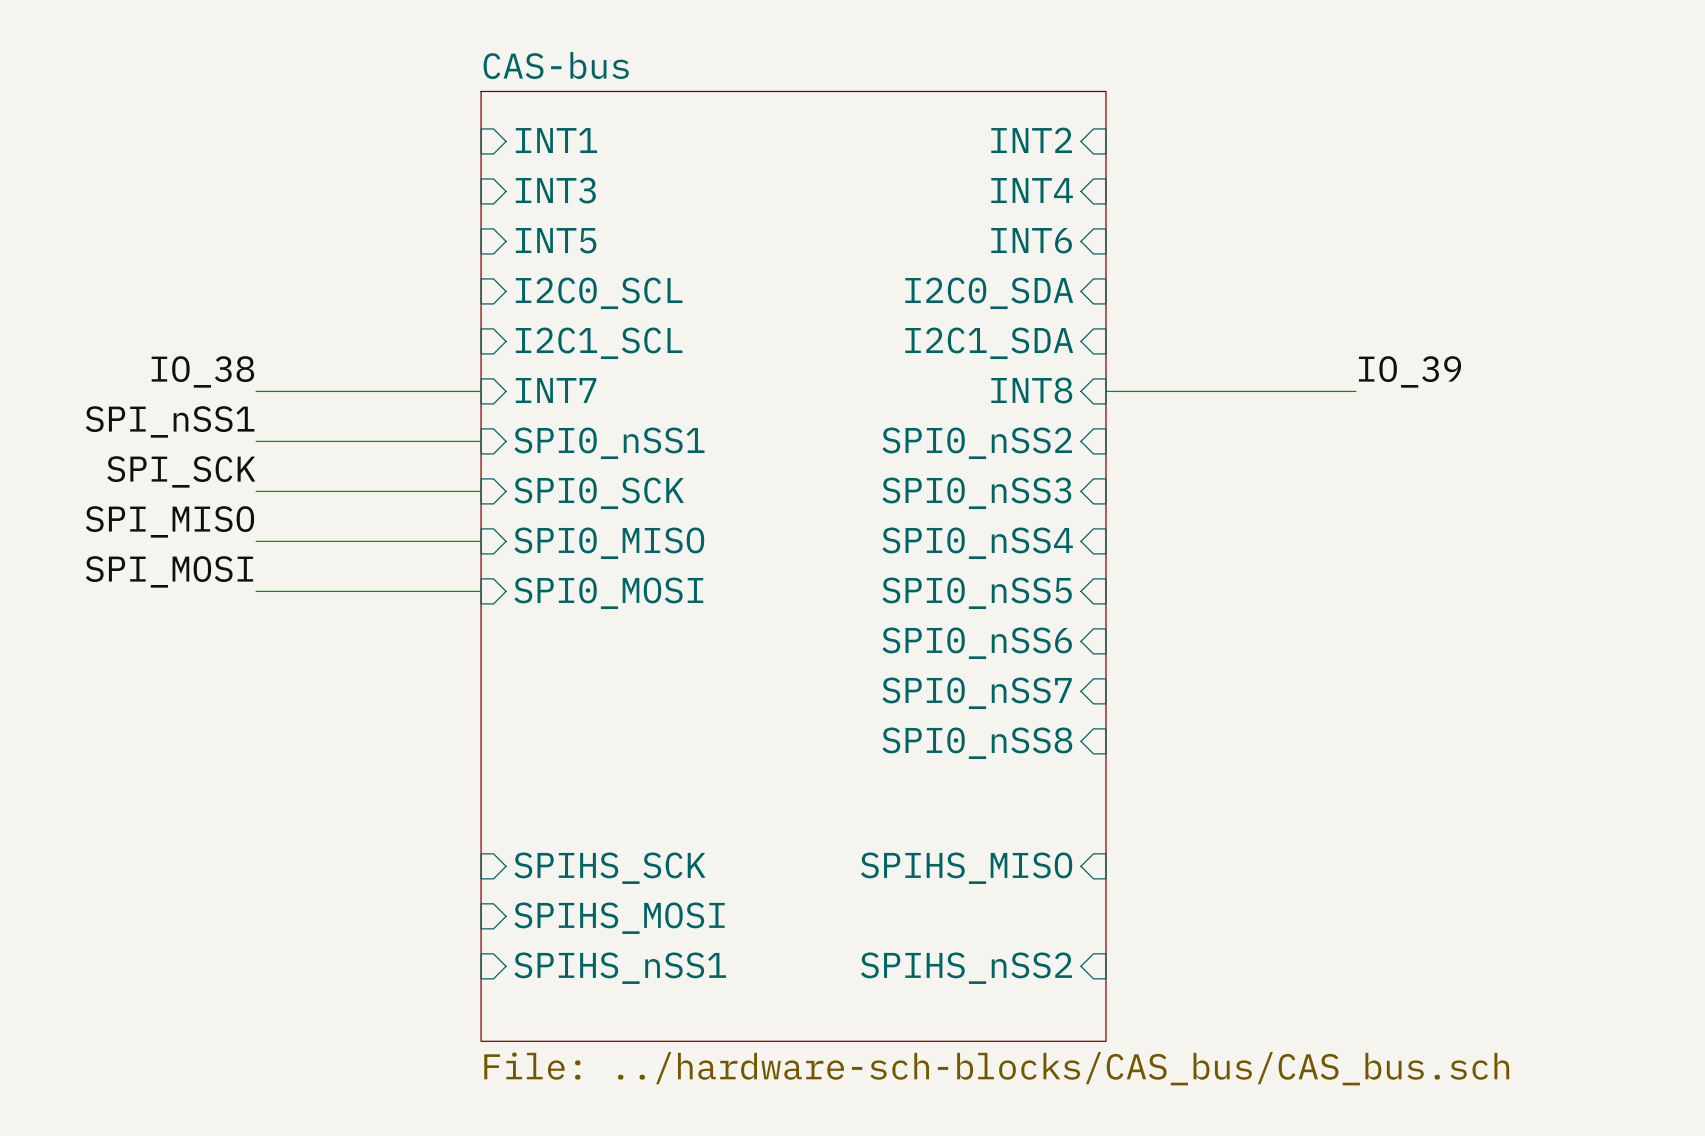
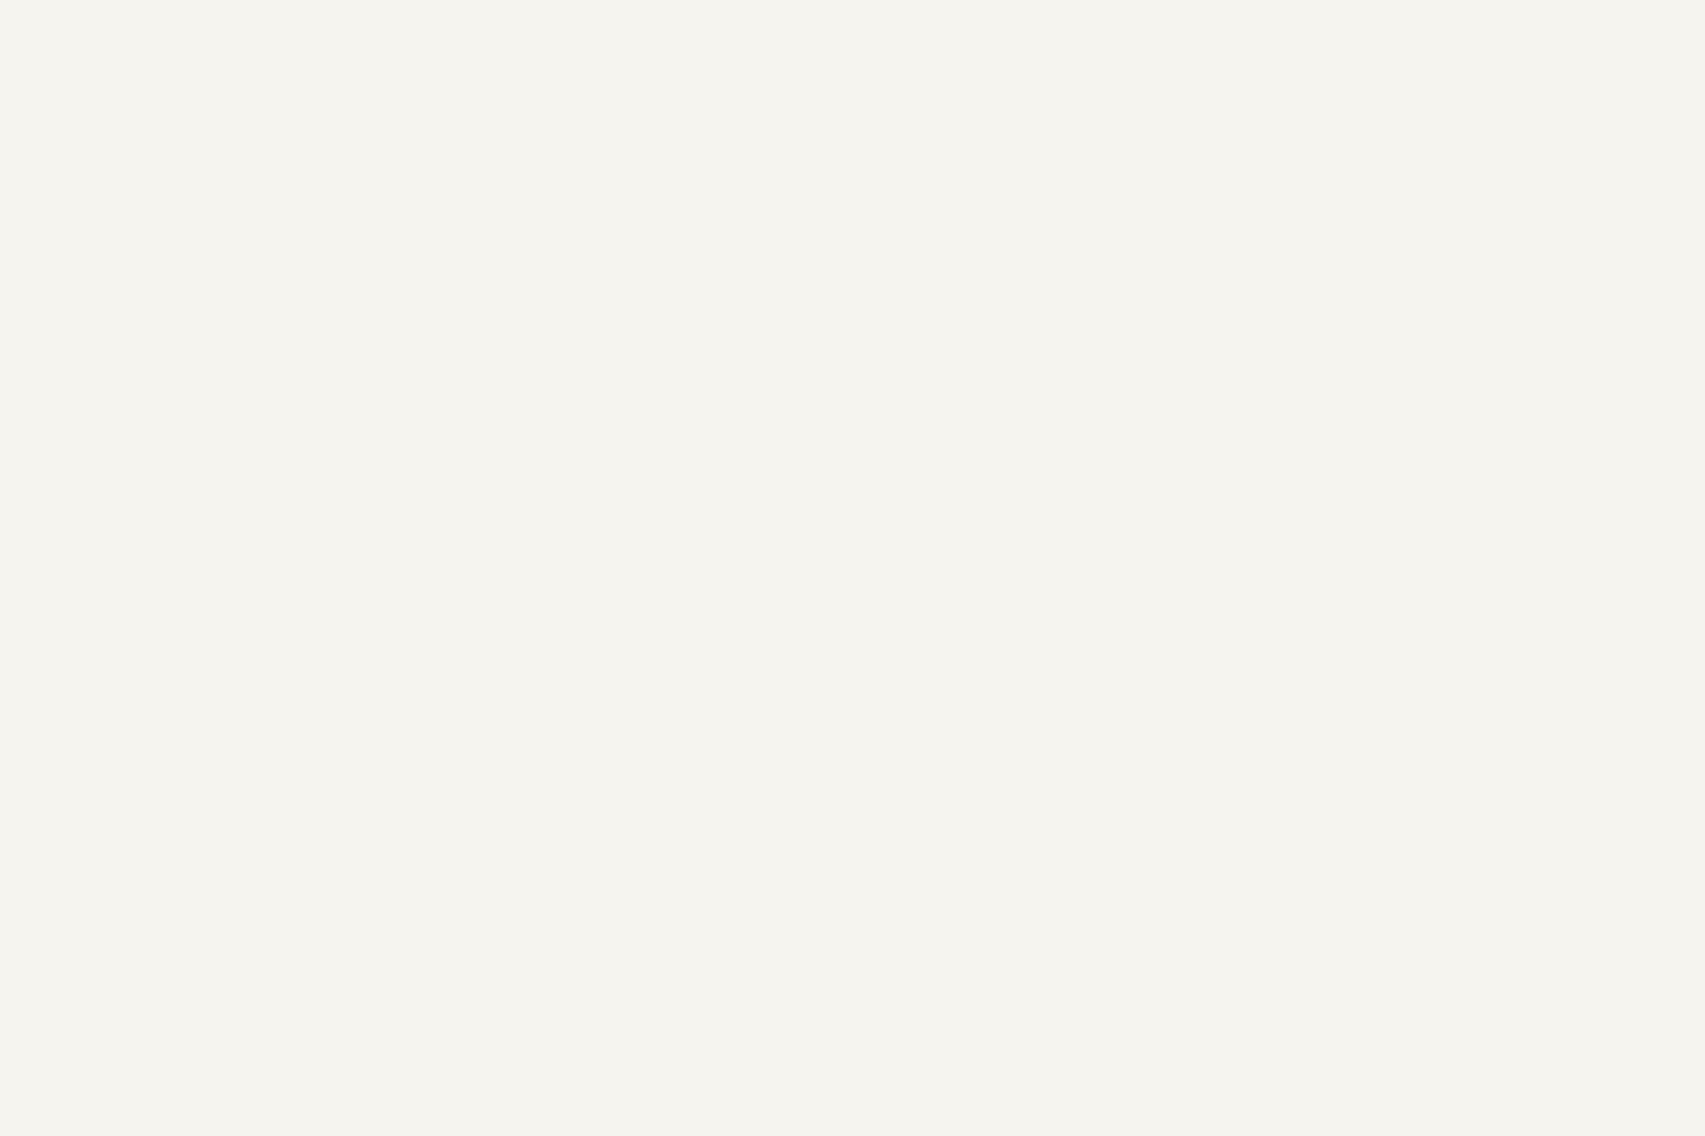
sheet pin: INT1 (556, 140) -> none
sheet pin: INT2 (1031, 140) -> none
sheet pin: INT3 (555, 190) -> none
sheet pin: INT4 (1032, 190) -> none
sheet pin: INT5 (556, 240) -> none
sheet pin: INT6 (1031, 240) -> none
sheet pin: I2C0_SCL (599, 293) -> none
sheet pin: I2C0_SDA (989, 293) -> none
sheet pin: I2C1_SCL (599, 343) -> none
sheet pin: I2C1_SDA (989, 343) -> none
label: IO_38 (202, 371) -> none
label: IO_39 (1410, 371) -> none
sheet pin: INT7 (556, 390) -> none
sheet pin: INT8 (1031, 390) -> none
wire: (256, 391) (481, 391) -> none
wire: (1105, 391) (1355, 391) -> none
label: SPI_nSS1 (170, 421) -> none
wire: (256, 441) (481, 441) -> none
sheet pin: SPI0_nSS1 (609, 443) -> none
sheet pin: SPI0_nSS2 (977, 443) -> none
label: SPI_SCK (181, 471) -> none
wire: (256, 491) (481, 491) -> none
sheet pin: SPI0_SCK (599, 493) -> none
sheet pin: SPI0_nSS3 (976, 493) -> none
label: SPI_MISO (169, 521) -> none
wire: (256, 541) (481, 541) -> none
sheet pin: SPI0_MISO (609, 543) -> none
sheet pin: SPI0_nSS4 (977, 543) -> none
sheet CAS-bus: File: ../hardware-sch-blocks/CAS_bus/CAS_bus.sch (793, 566) -> none
label: SPI_MOSI (169, 571) -> none
wire: (256, 591) (481, 591) -> none
sheet pin: SPI0_MOSI (608, 593) -> none
sheet pin: SPI0_nSS5 (977, 593) -> none
sheet pin: SPI0_nSS6 (977, 643) -> none
sheet pin: SPI0_nSS7 (977, 693) -> none
sheet pin: SPI0_nSS8 (977, 743) -> none
sheet pin: SPIHS_SCK (609, 868) -> none
sheet pin: SPIHS_MISO (966, 868) -> none
sheet pin: SPIHS_MOSI (619, 918) -> none
sheet pin: SPIHS_nSS1 (620, 968) -> none
sheet pin: SPIHS_nSS2 (966, 968) -> none

